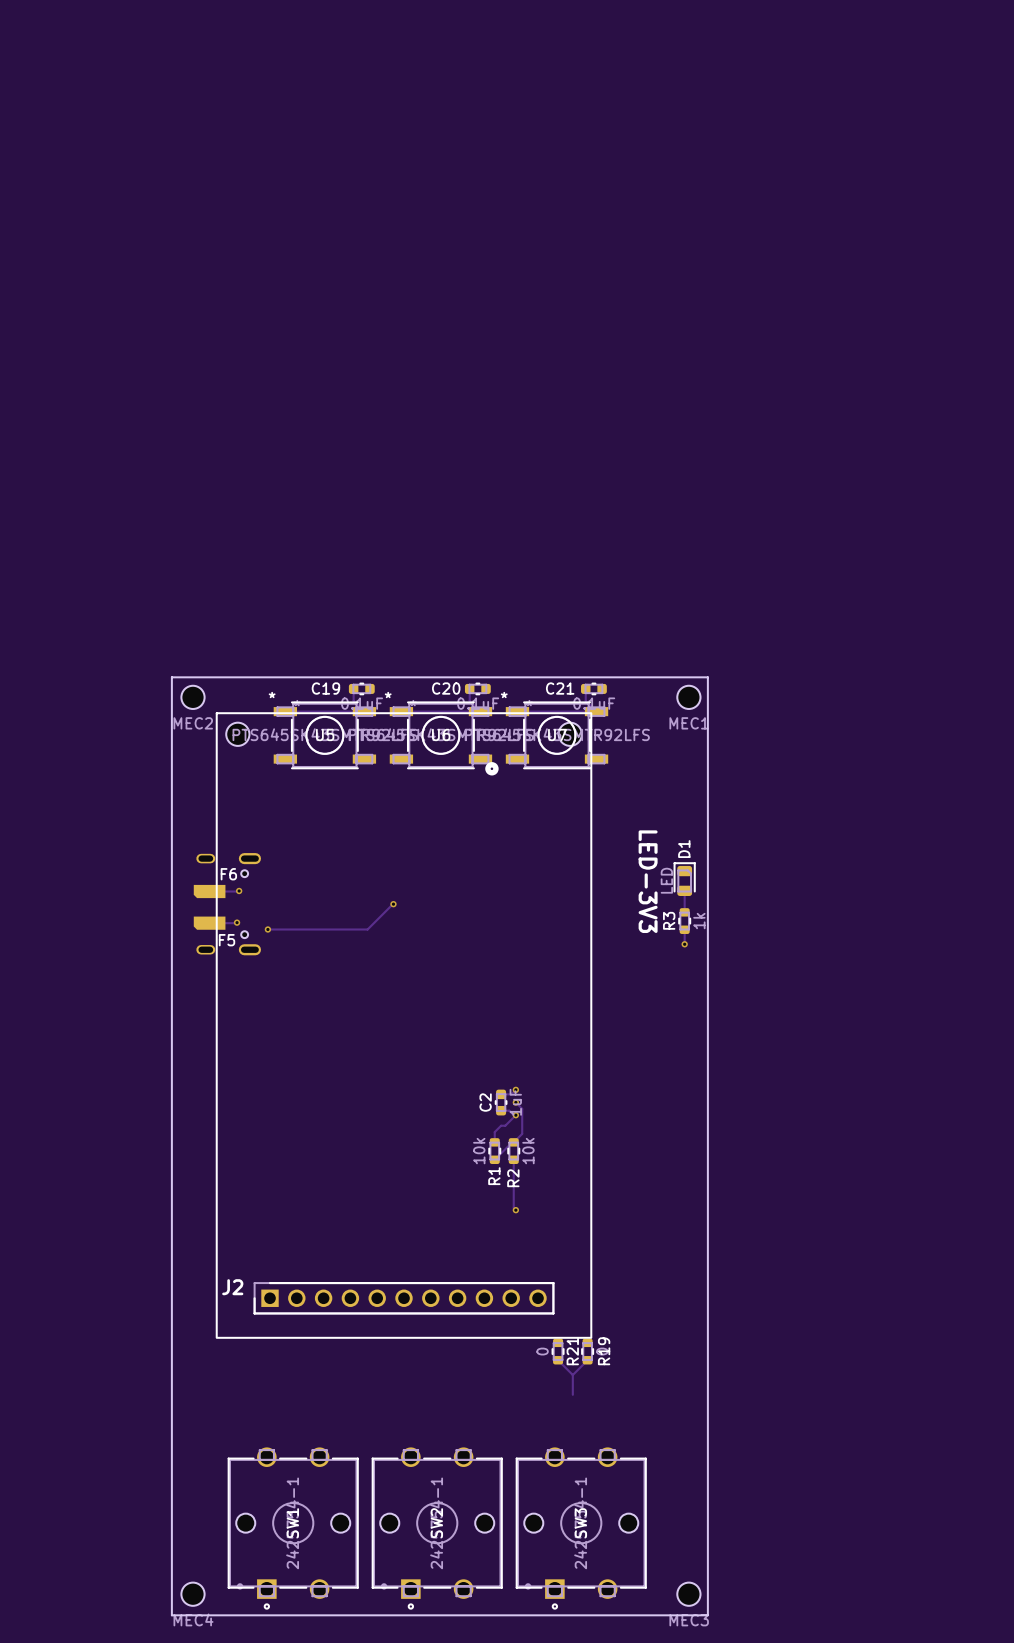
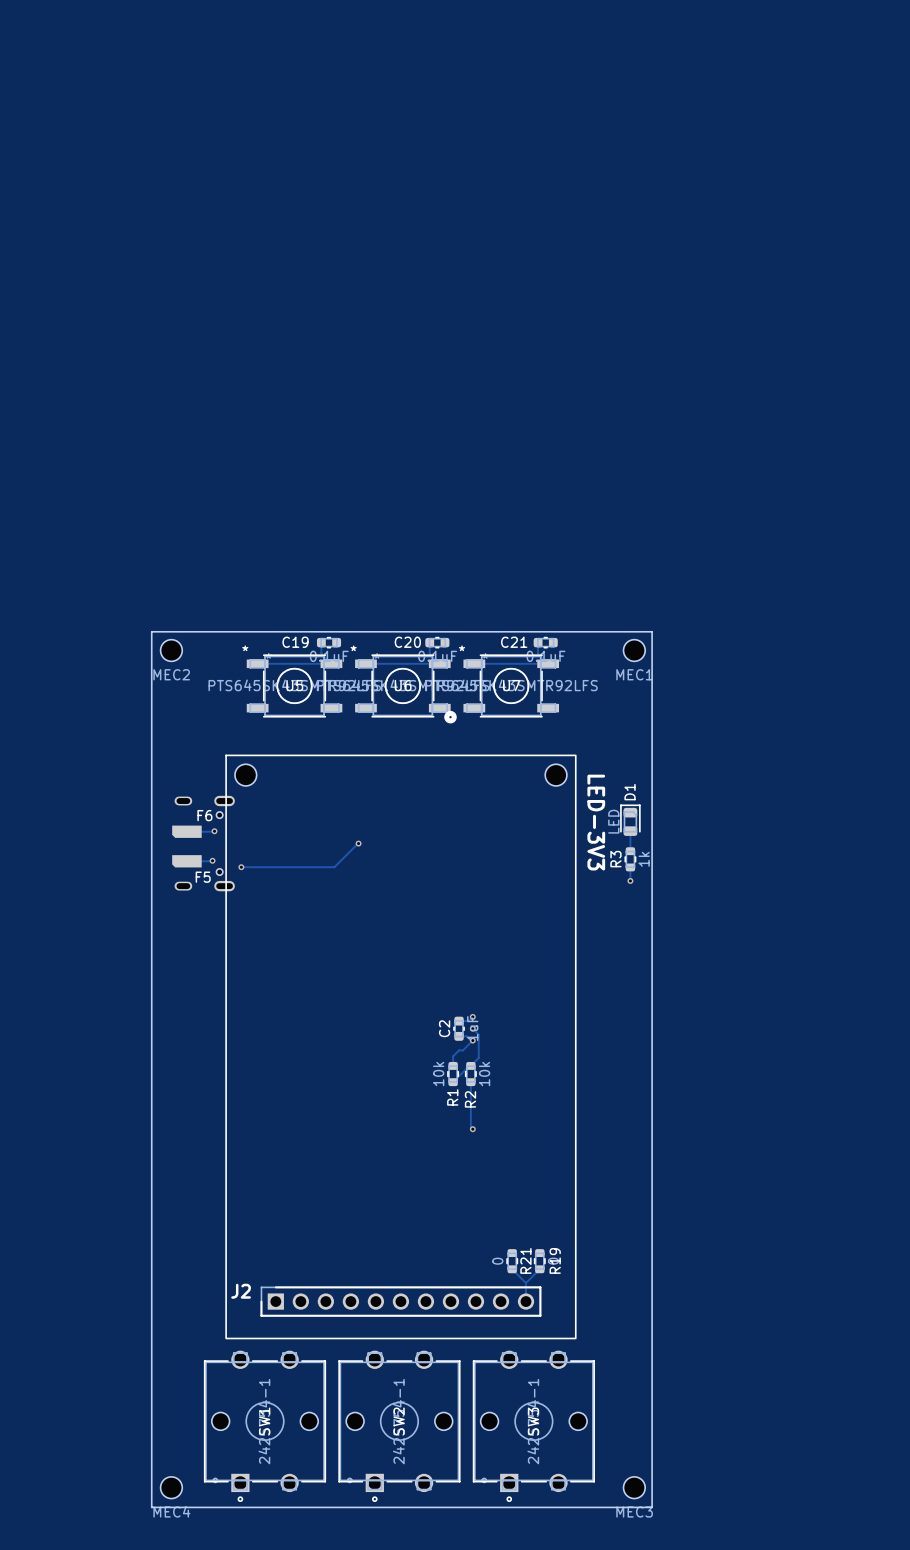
J2 position: (404, 1025) -> (400, 1046)

